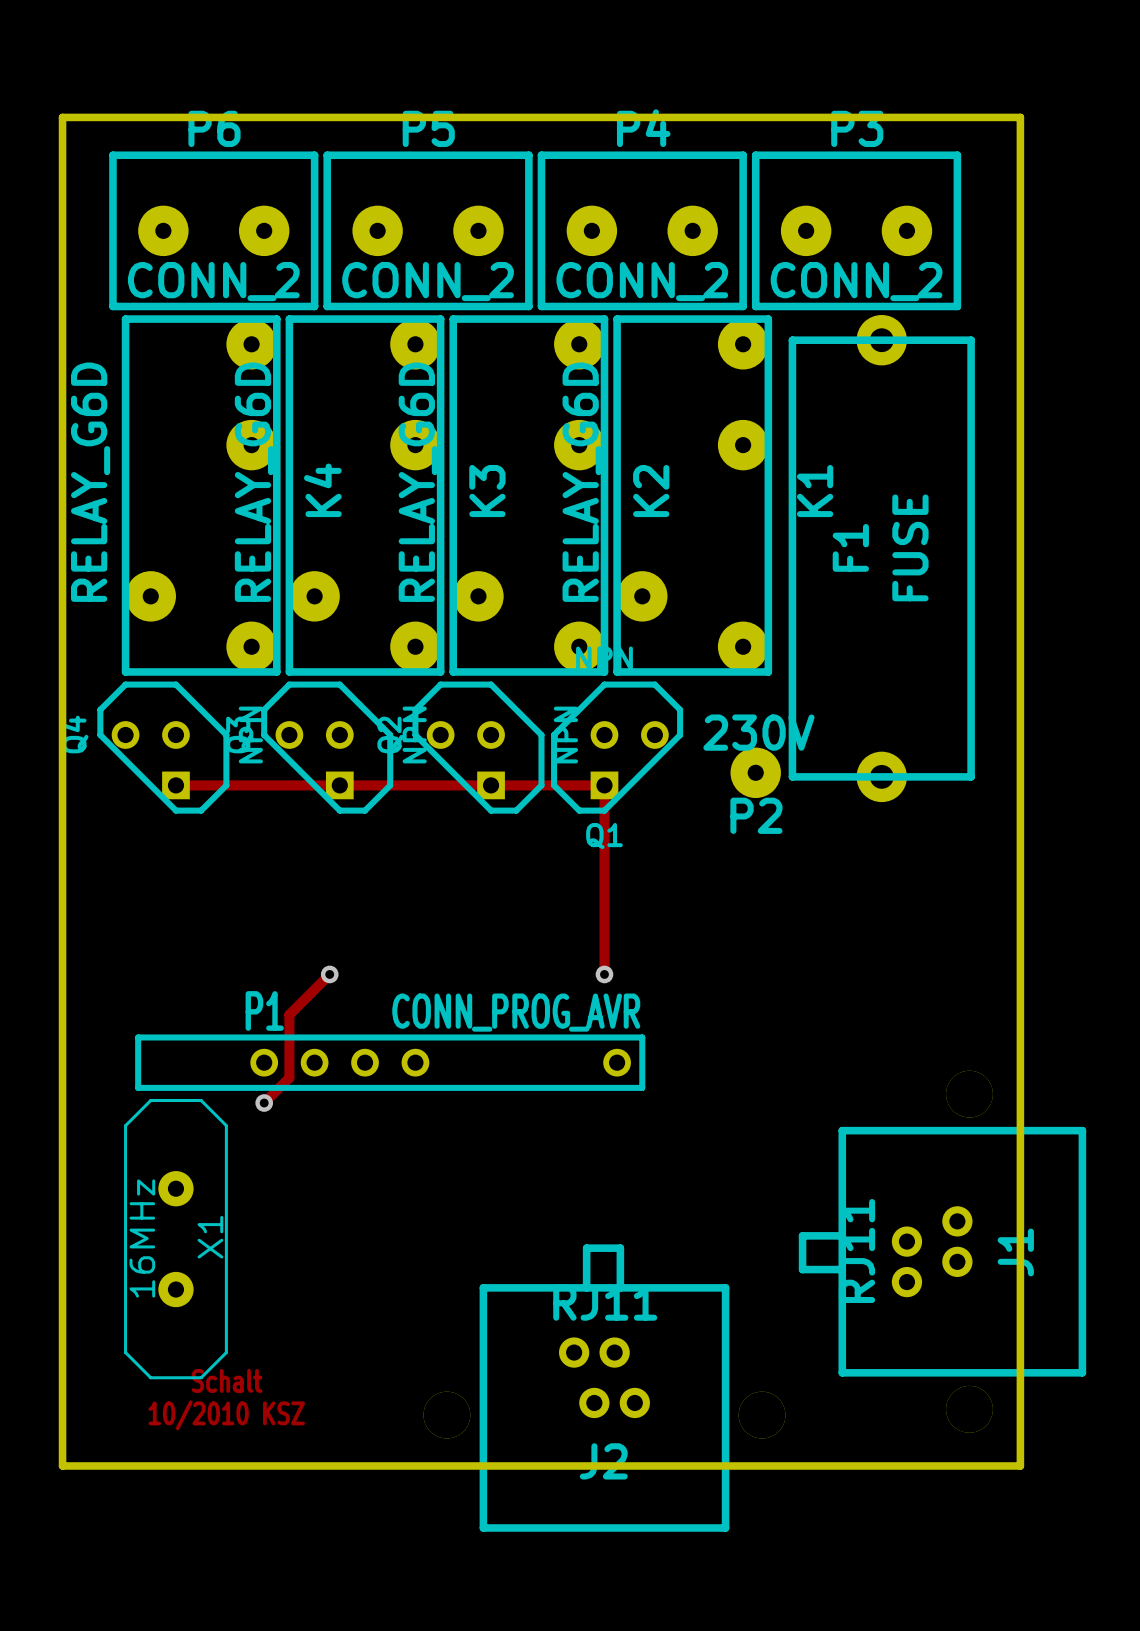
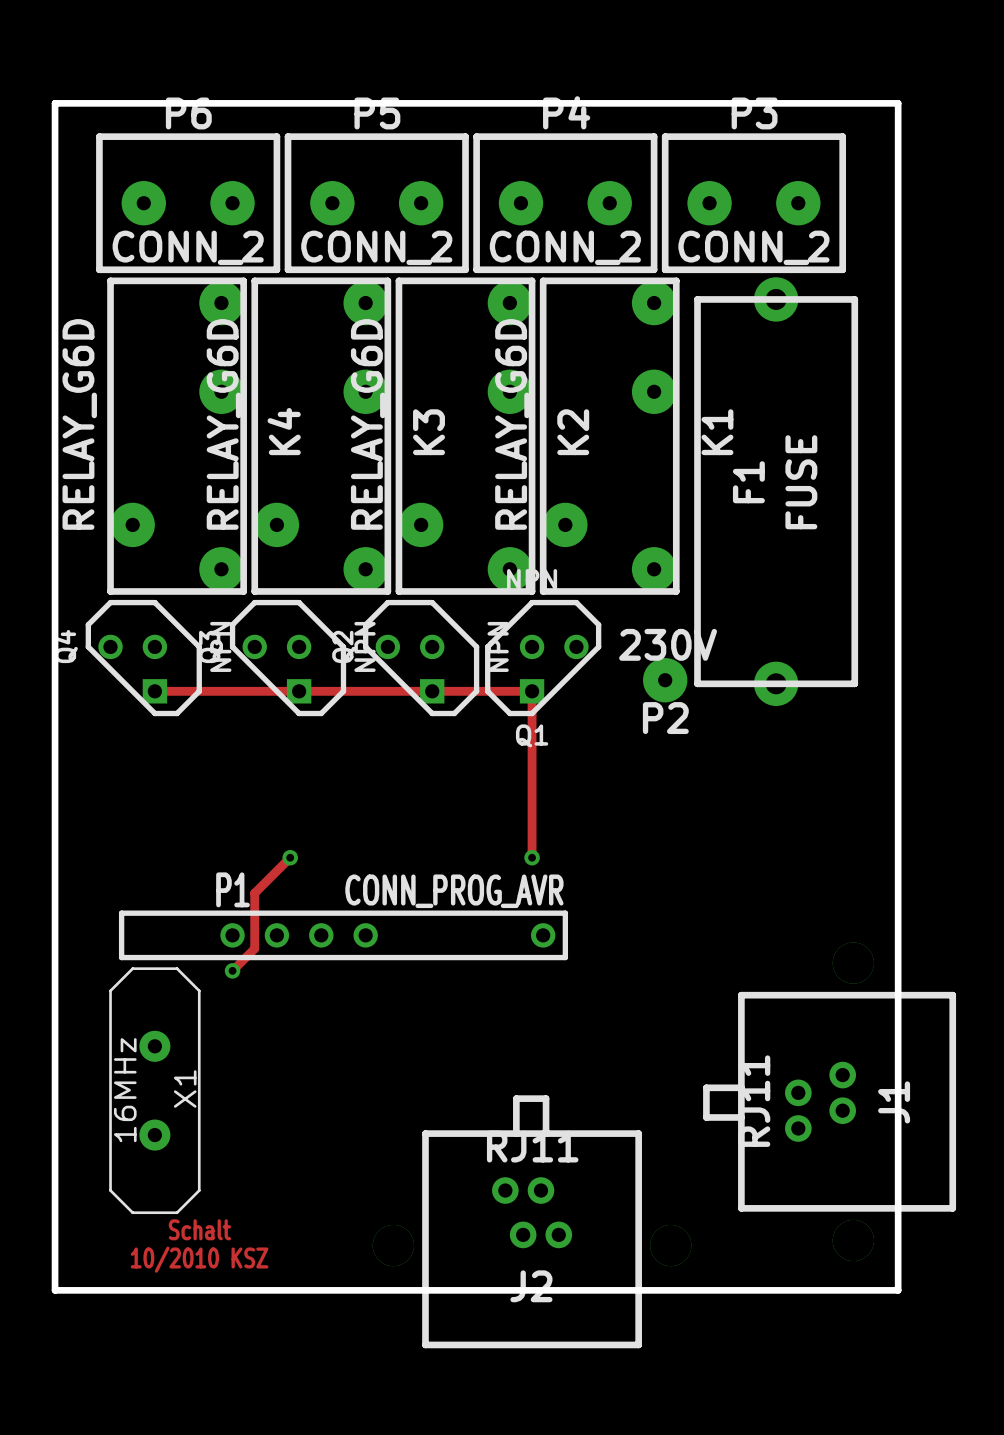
text position: Schalt (227, 1380) -> Schalt (199, 1229)
text position: 10/2010 KSZ (226, 1415) -> 10/2010 KSZ (199, 1259)

